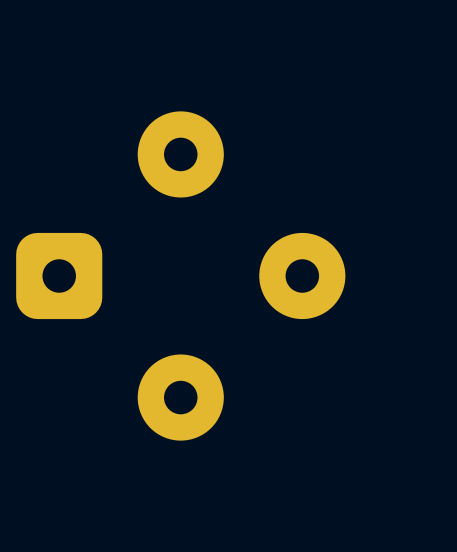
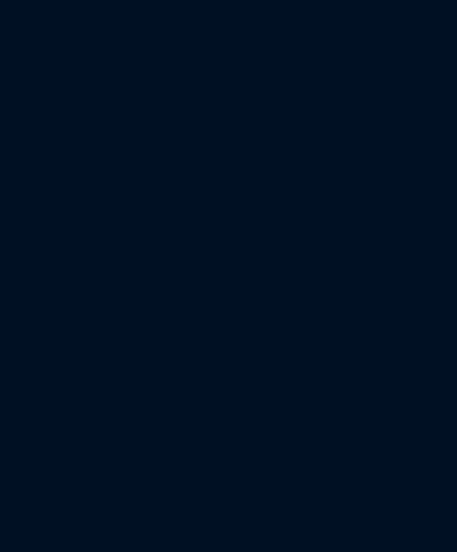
part: (180, 275) -> none

